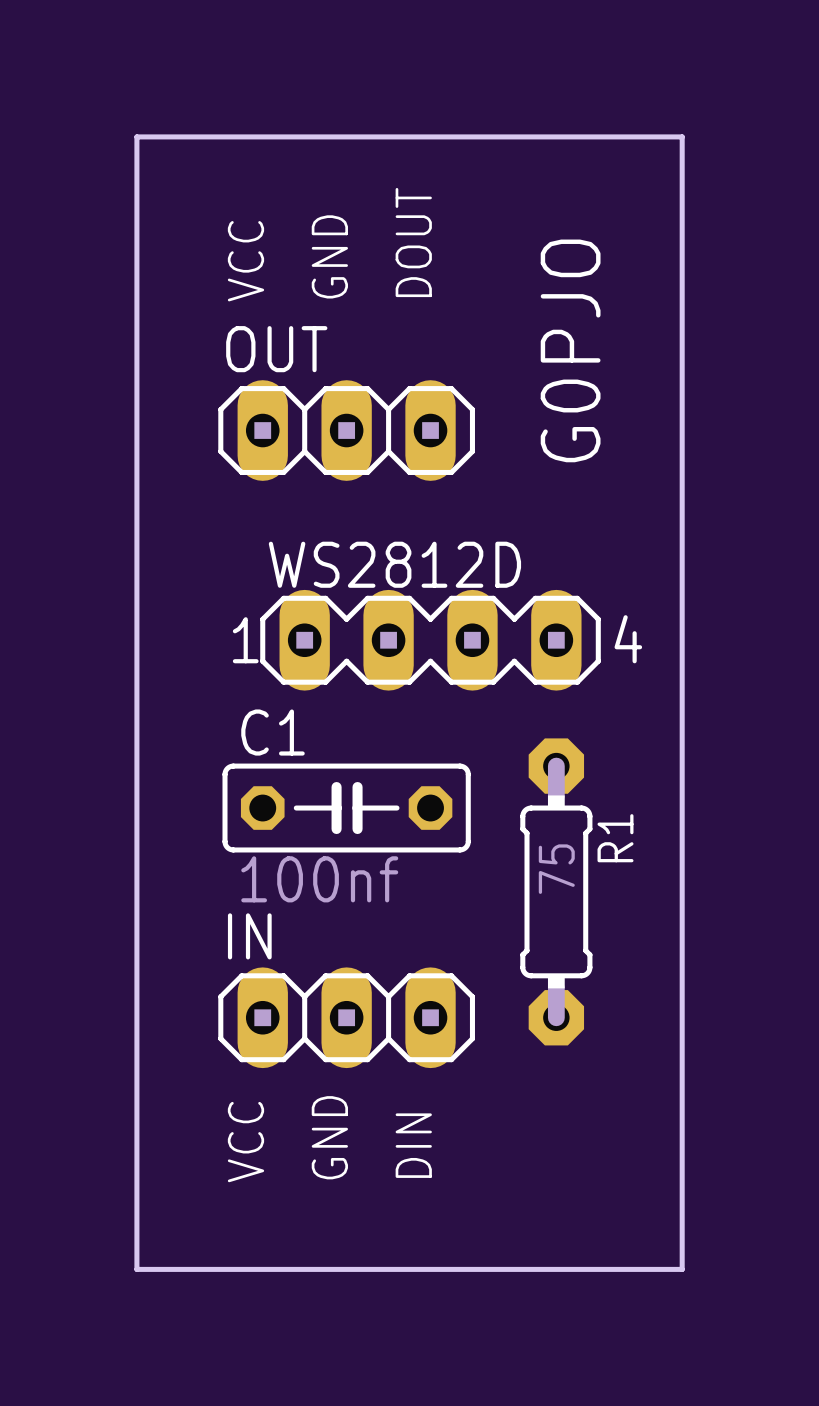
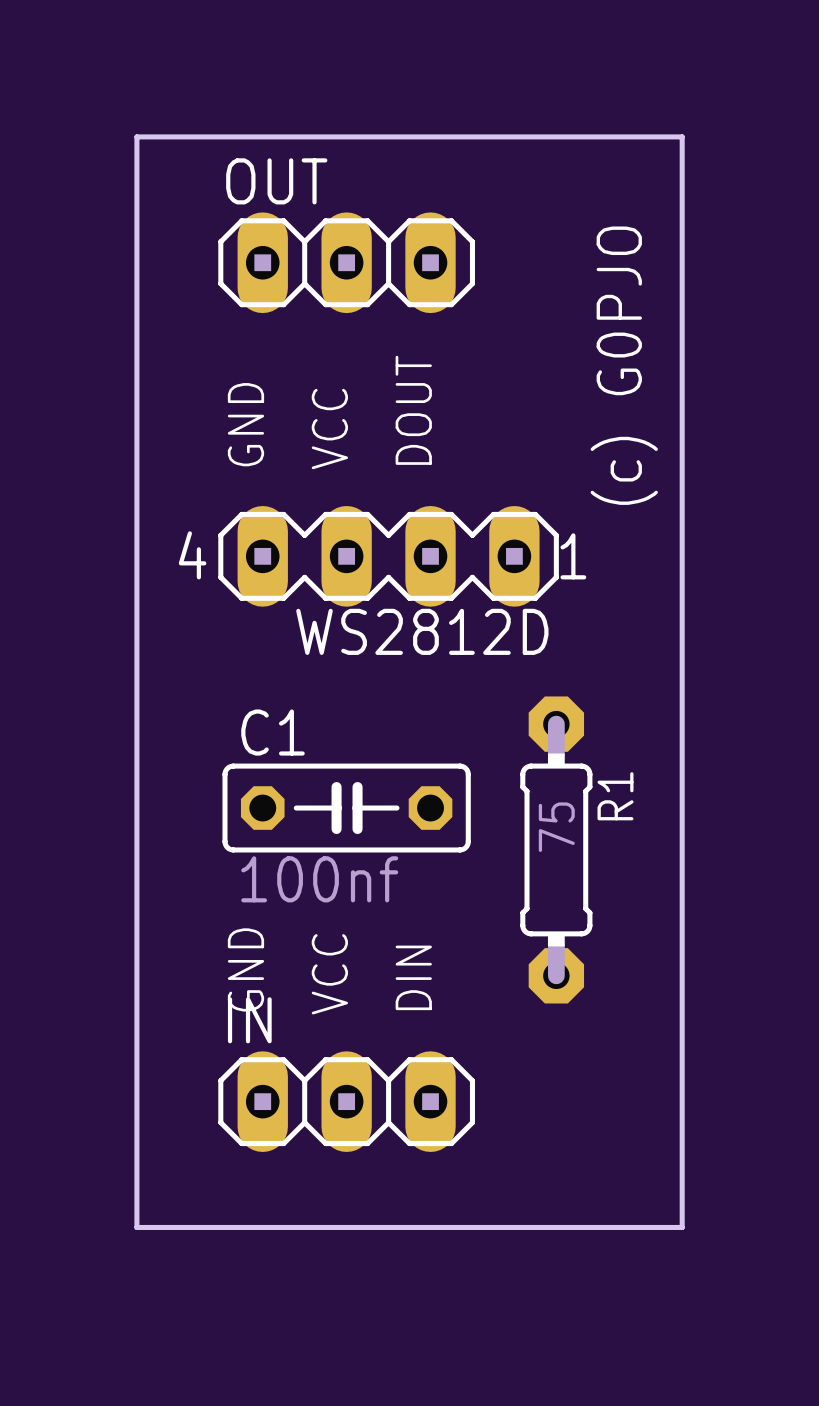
text position: DOUT (413, 242) -> DOUT (413, 410)
text position: GND (329, 256) -> GND (245, 424)
text position: VCC (245, 261) -> VCC (329, 429)
text: G0PJO (570, 350) -> (c) G0PJO (624, 365)
OUT position: (346, 430) -> (346, 262)
WS2812D name position: WS2812D (394, 564) -> WS2812D (422, 631)
WS2812D text position: 4 (628, 639) -> 4 (192, 555)
WS2812D text position: 1 (245, 640) -> 1 (573, 556)
WS2812D position: (430, 640) -> (388, 556)
R1 position: (556, 891) -> (556, 849)
IN position: (346, 1017) -> (346, 1101)
text position: GND (329, 1137) -> GND (245, 969)
text position: VCC (245, 1142) -> VCC (329, 974)
text position: DIN (413, 1145) -> DIN (413, 977)
board edge: (136, 1227) (136, 1269) (682, 1269) (682, 1227) -> (136, 1227) (682, 1227)

